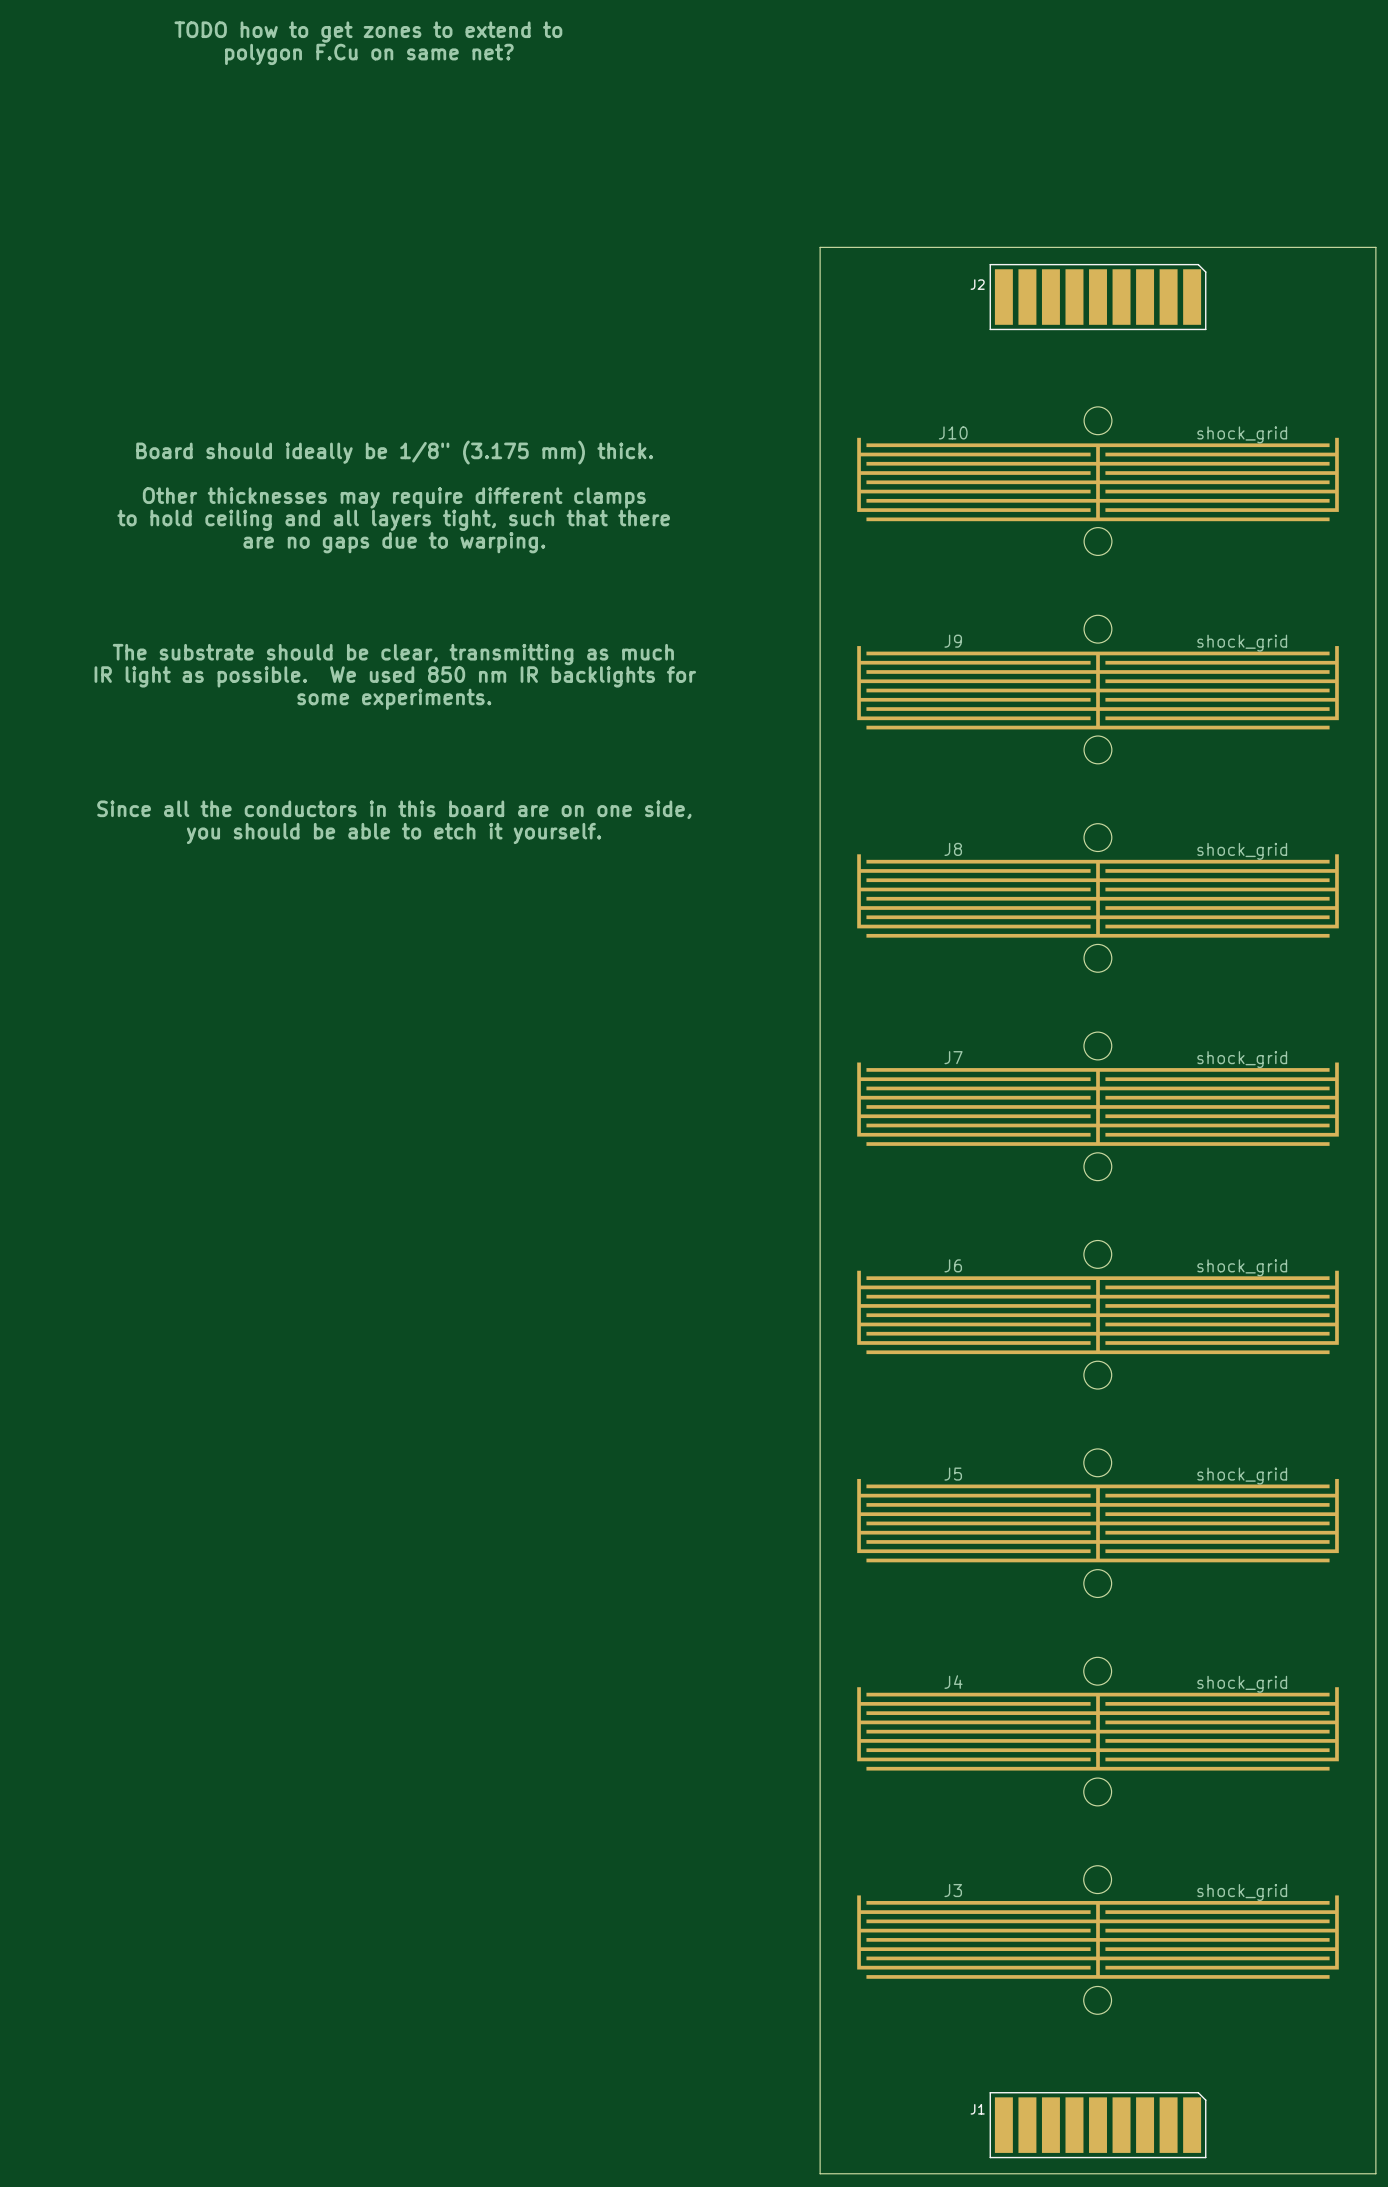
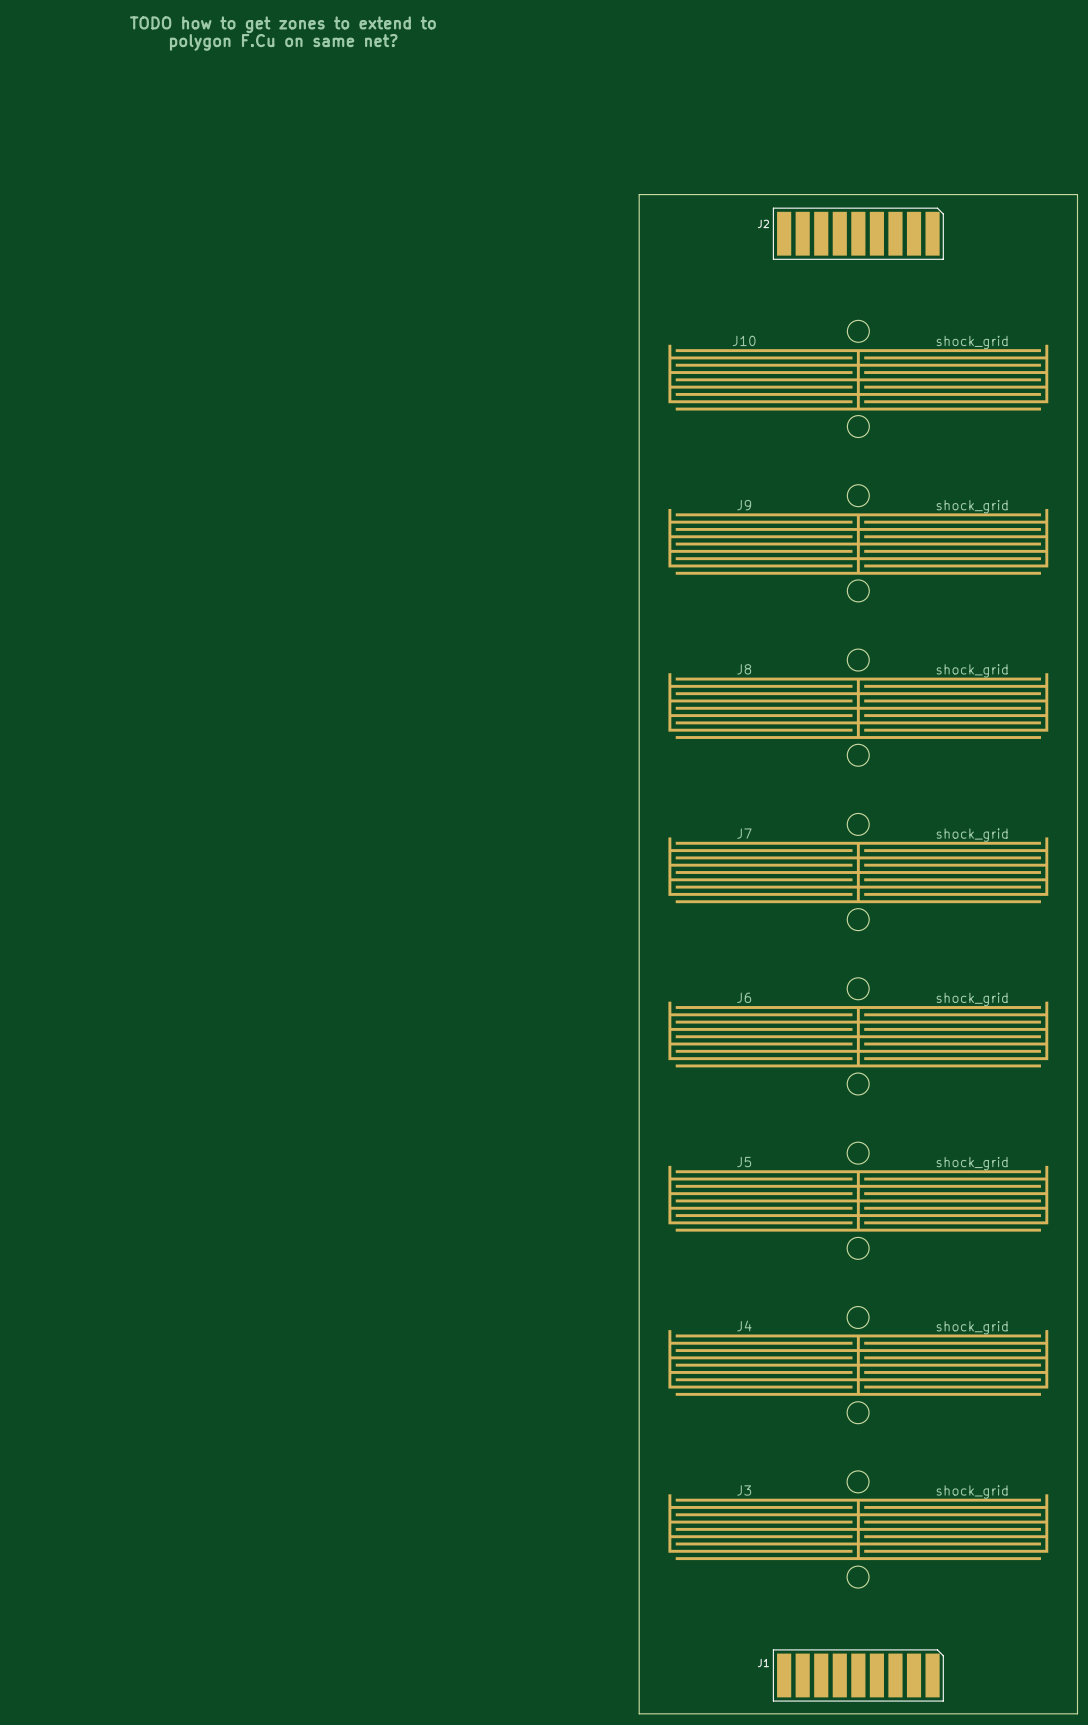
text: Board should ideally be 1/8" (3.175 mm) thick. (394, 452) -> none
text: Other thicknesses may require different clamps (394, 497) -> none
text: to hold ceiling and all layers tight, such that there (393, 520) -> none
text: are no gaps due to warping. (394, 542) -> none
text: The substrate should be clear, transmitting as much (393, 654) -> none
text: IR light as possible. We used 850 nm IR backlights for (395, 676) -> none
text: some experiments. (394, 699) -> none
text: Since all the conductors in this board are on one side, (394, 809) -> none
text: you should be able to etch it yourself. (393, 833) -> none

